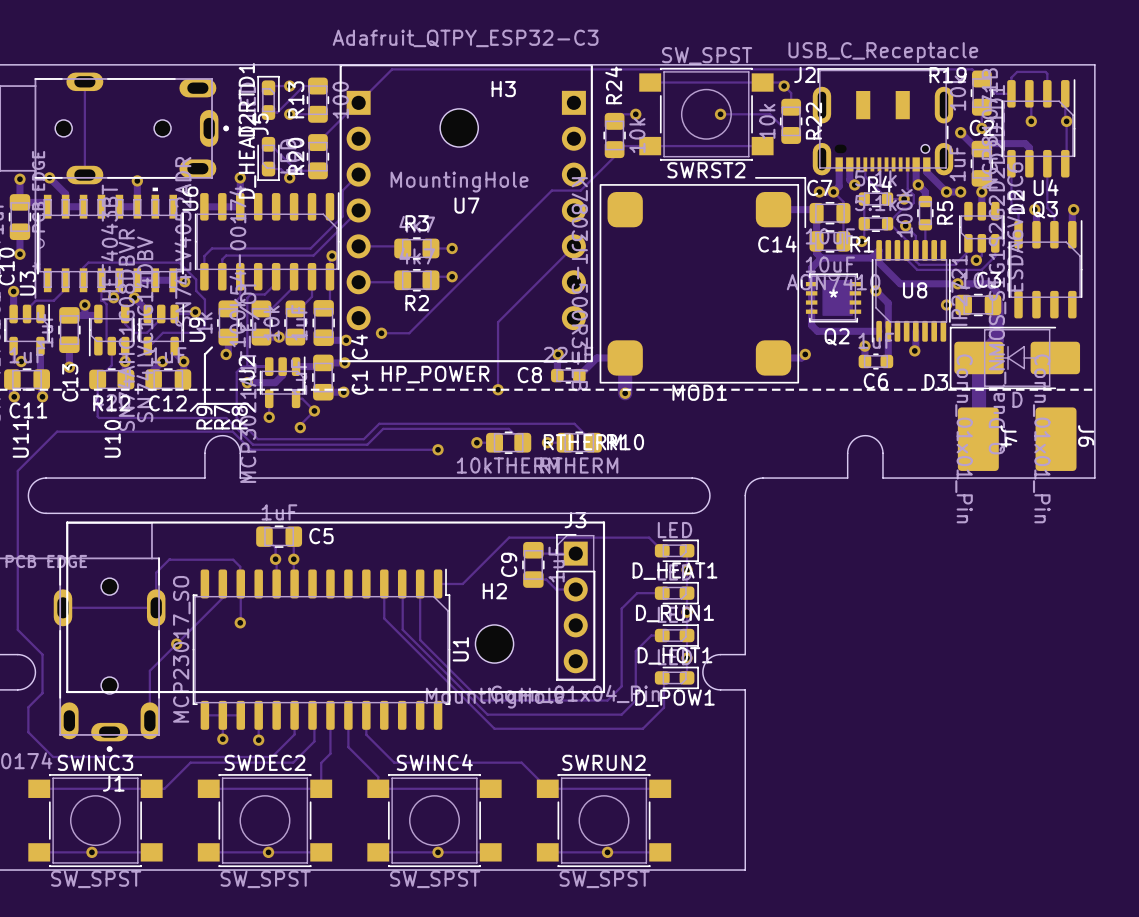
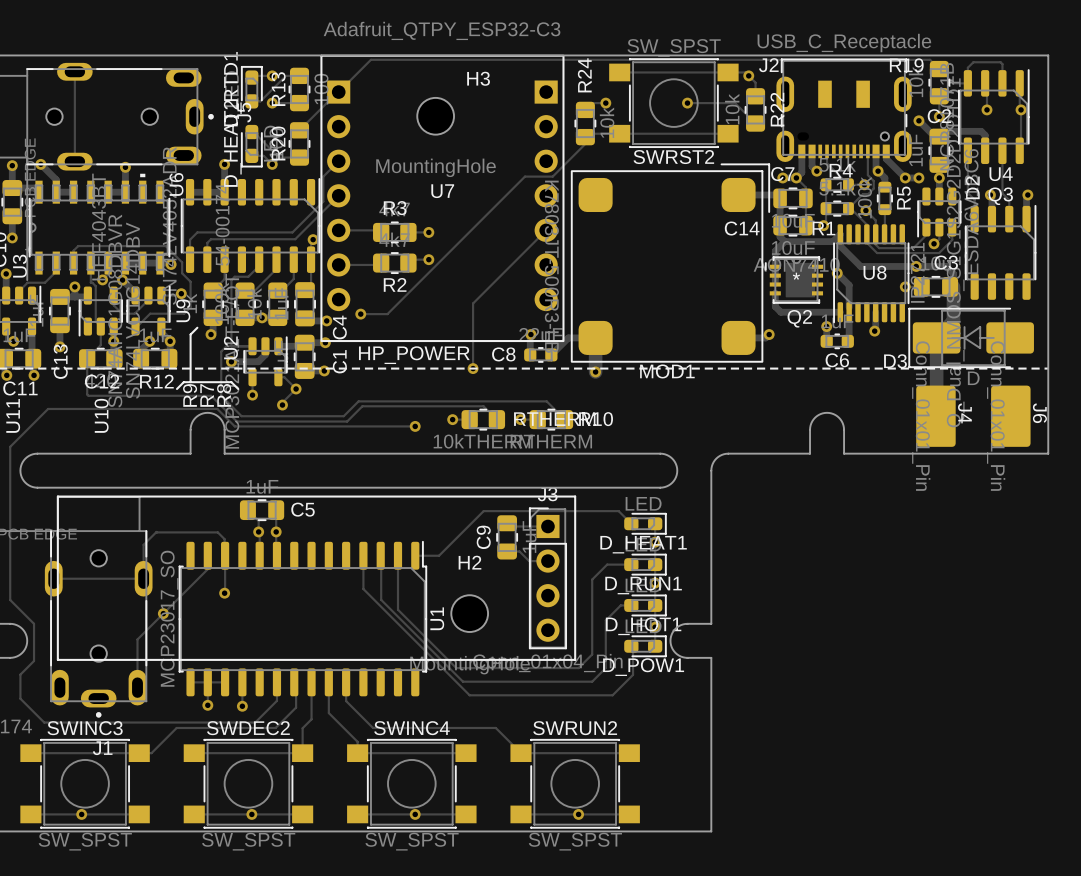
R12 name position: R12 (111, 403) -> R12 (156, 381)
C12 name position: C12 (167, 403) -> C12 (102, 381)

